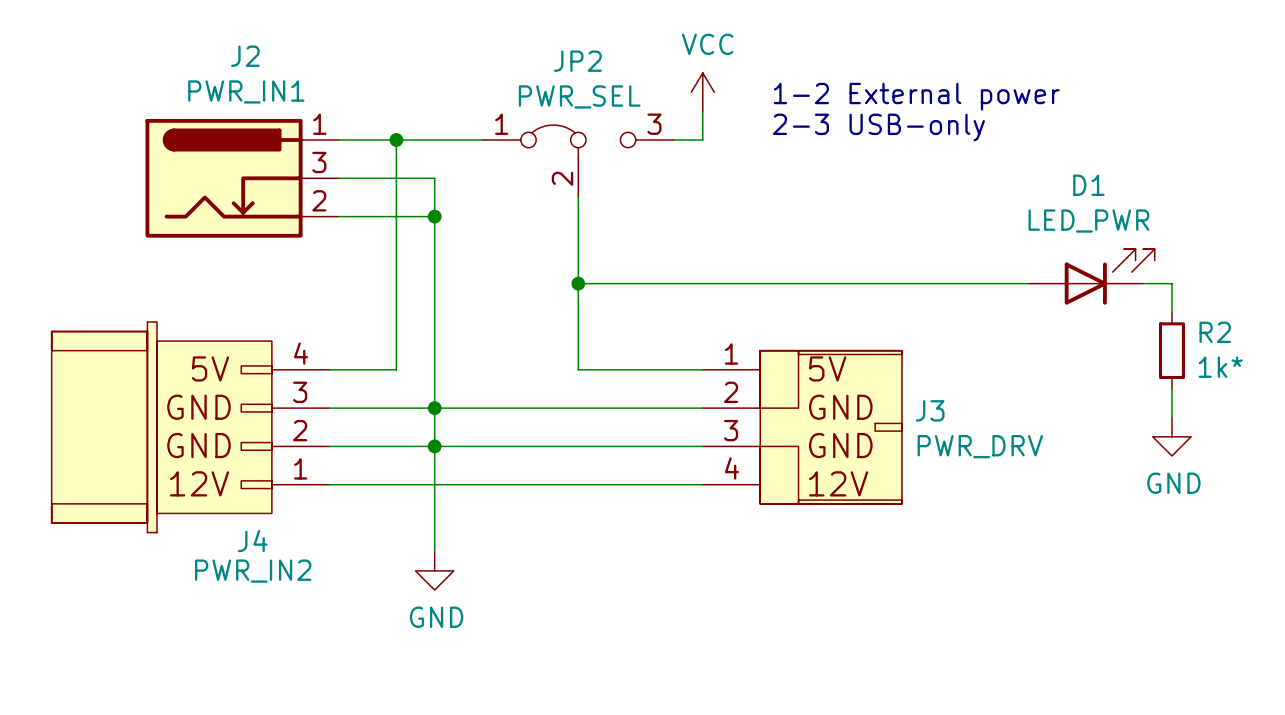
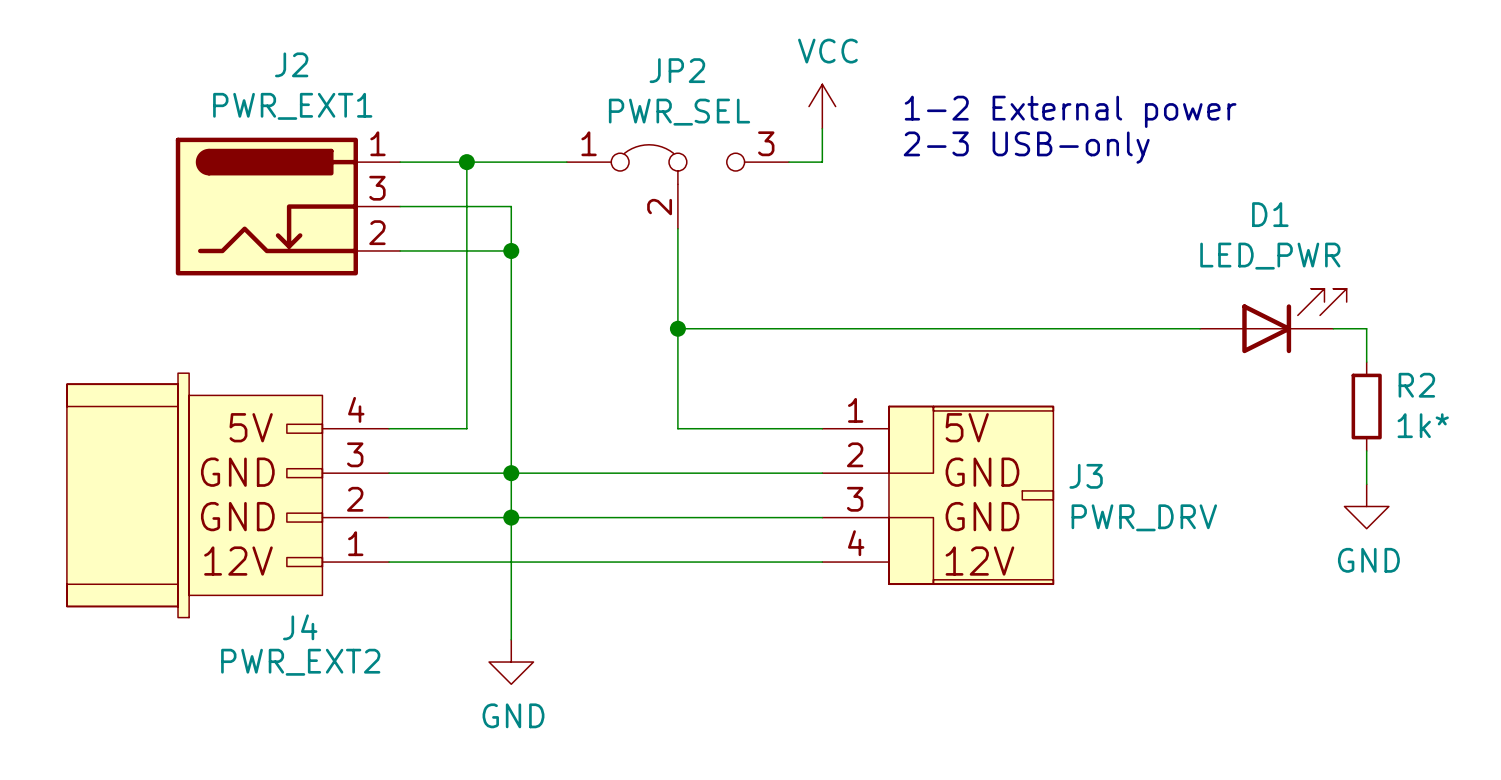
J2 value: PWR_IN1 (246, 91) -> PWR_EXT1 (292, 106)
J4 value: PWR_IN2 (253, 571) -> PWR_EXT2 (300, 662)

